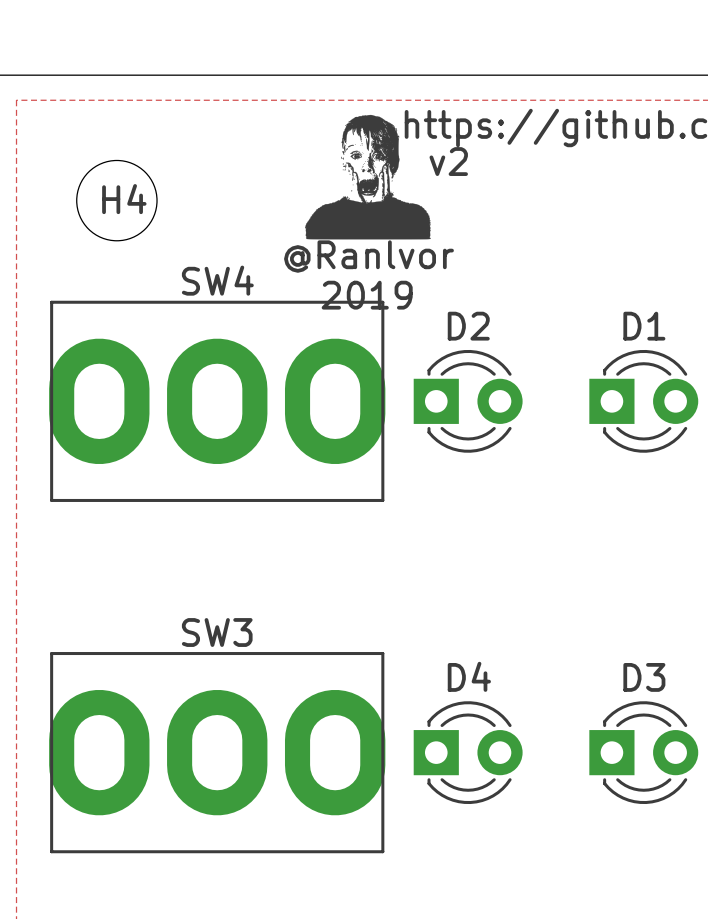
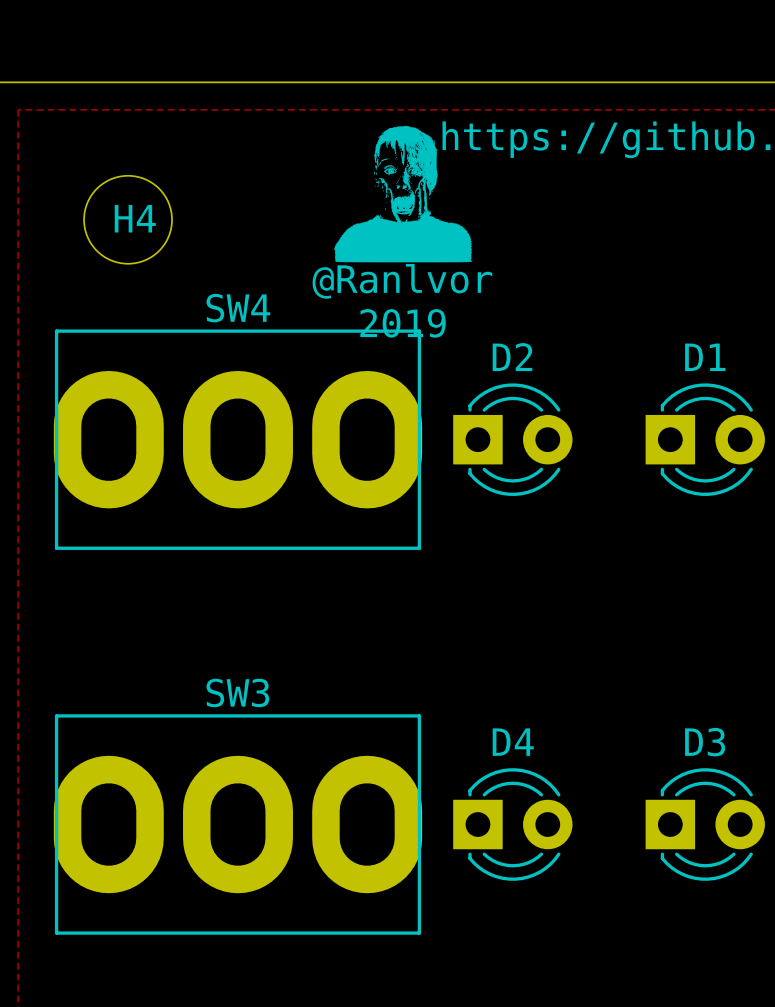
text: v2 (448, 161) -> none

